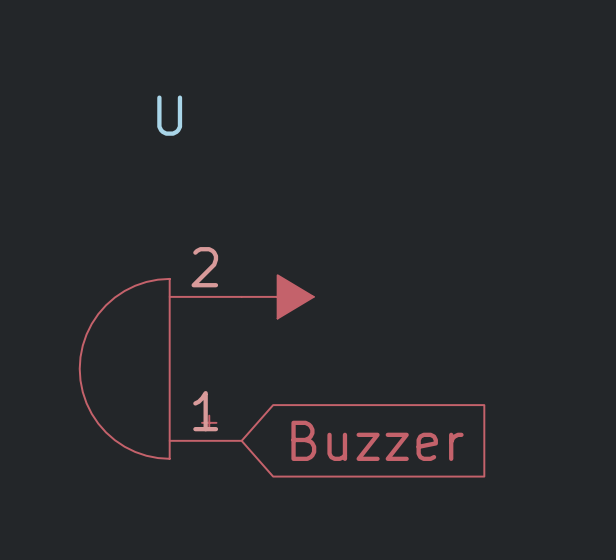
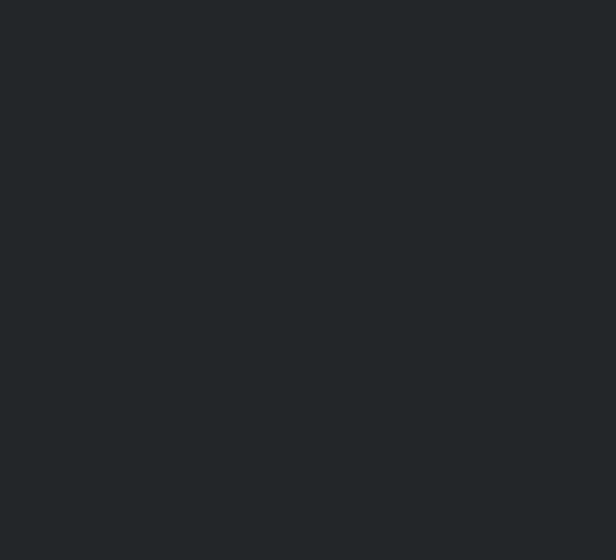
power symbol: (277, 296) -> none
U: (160, 368) -> none
global label: Buzzer (377, 440) -> none

